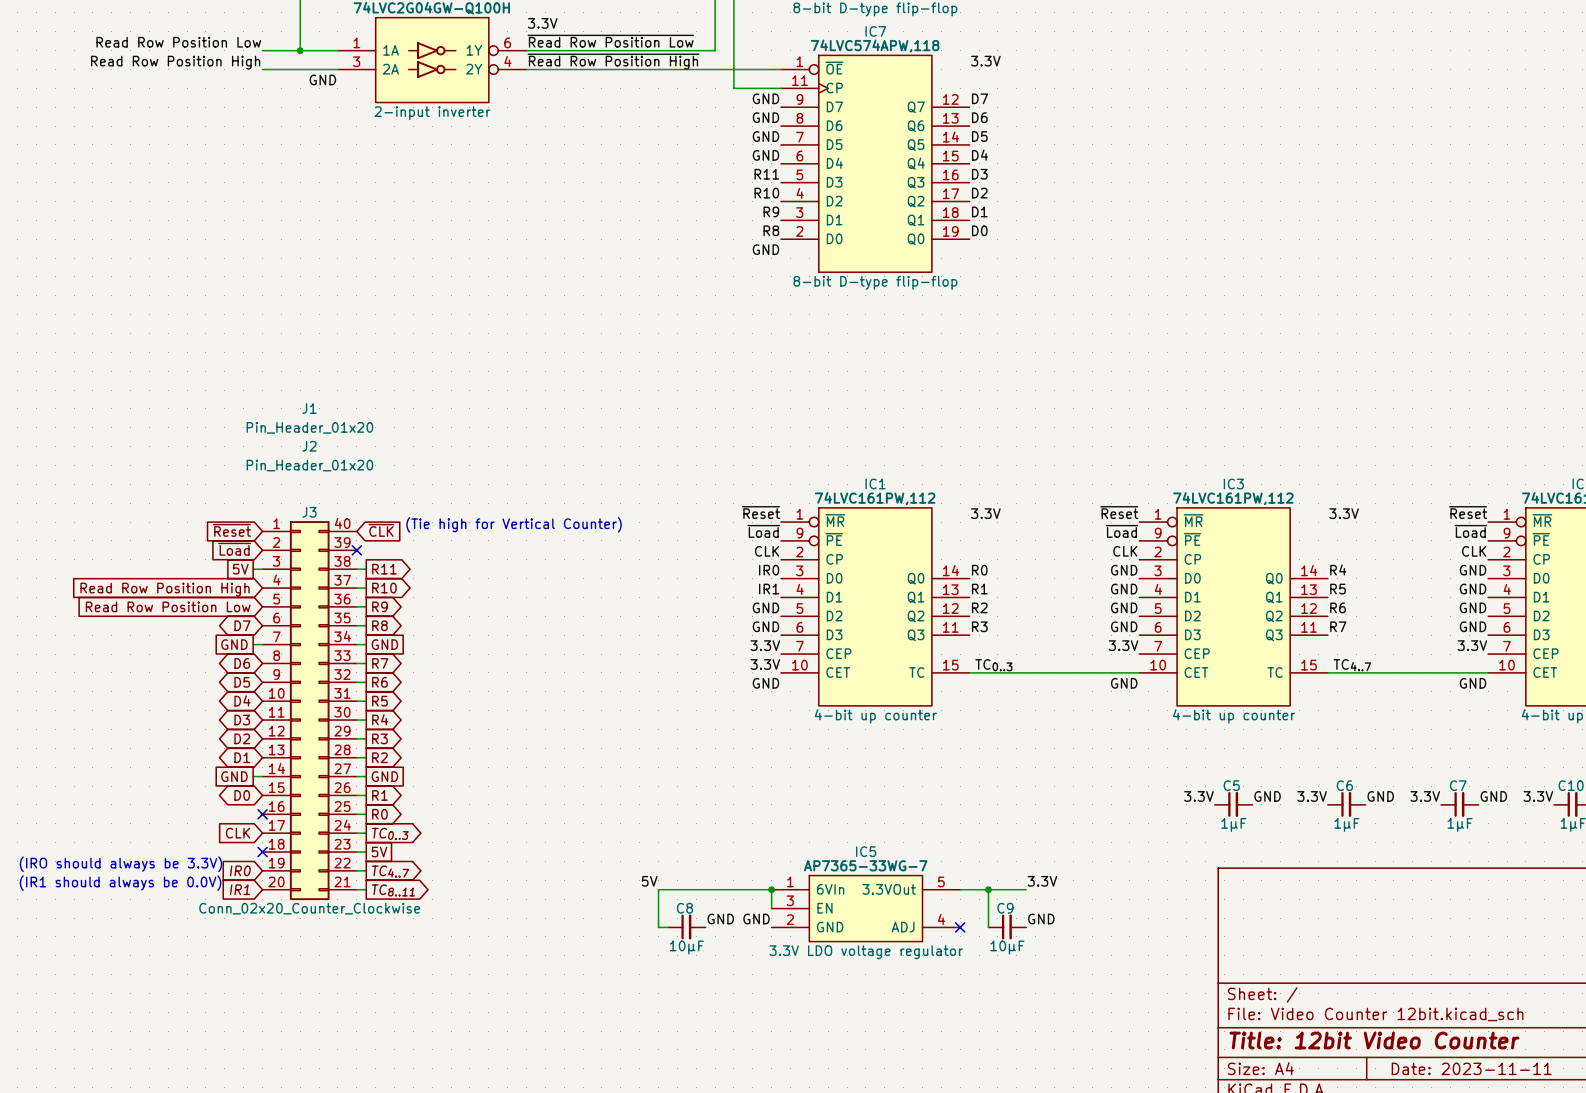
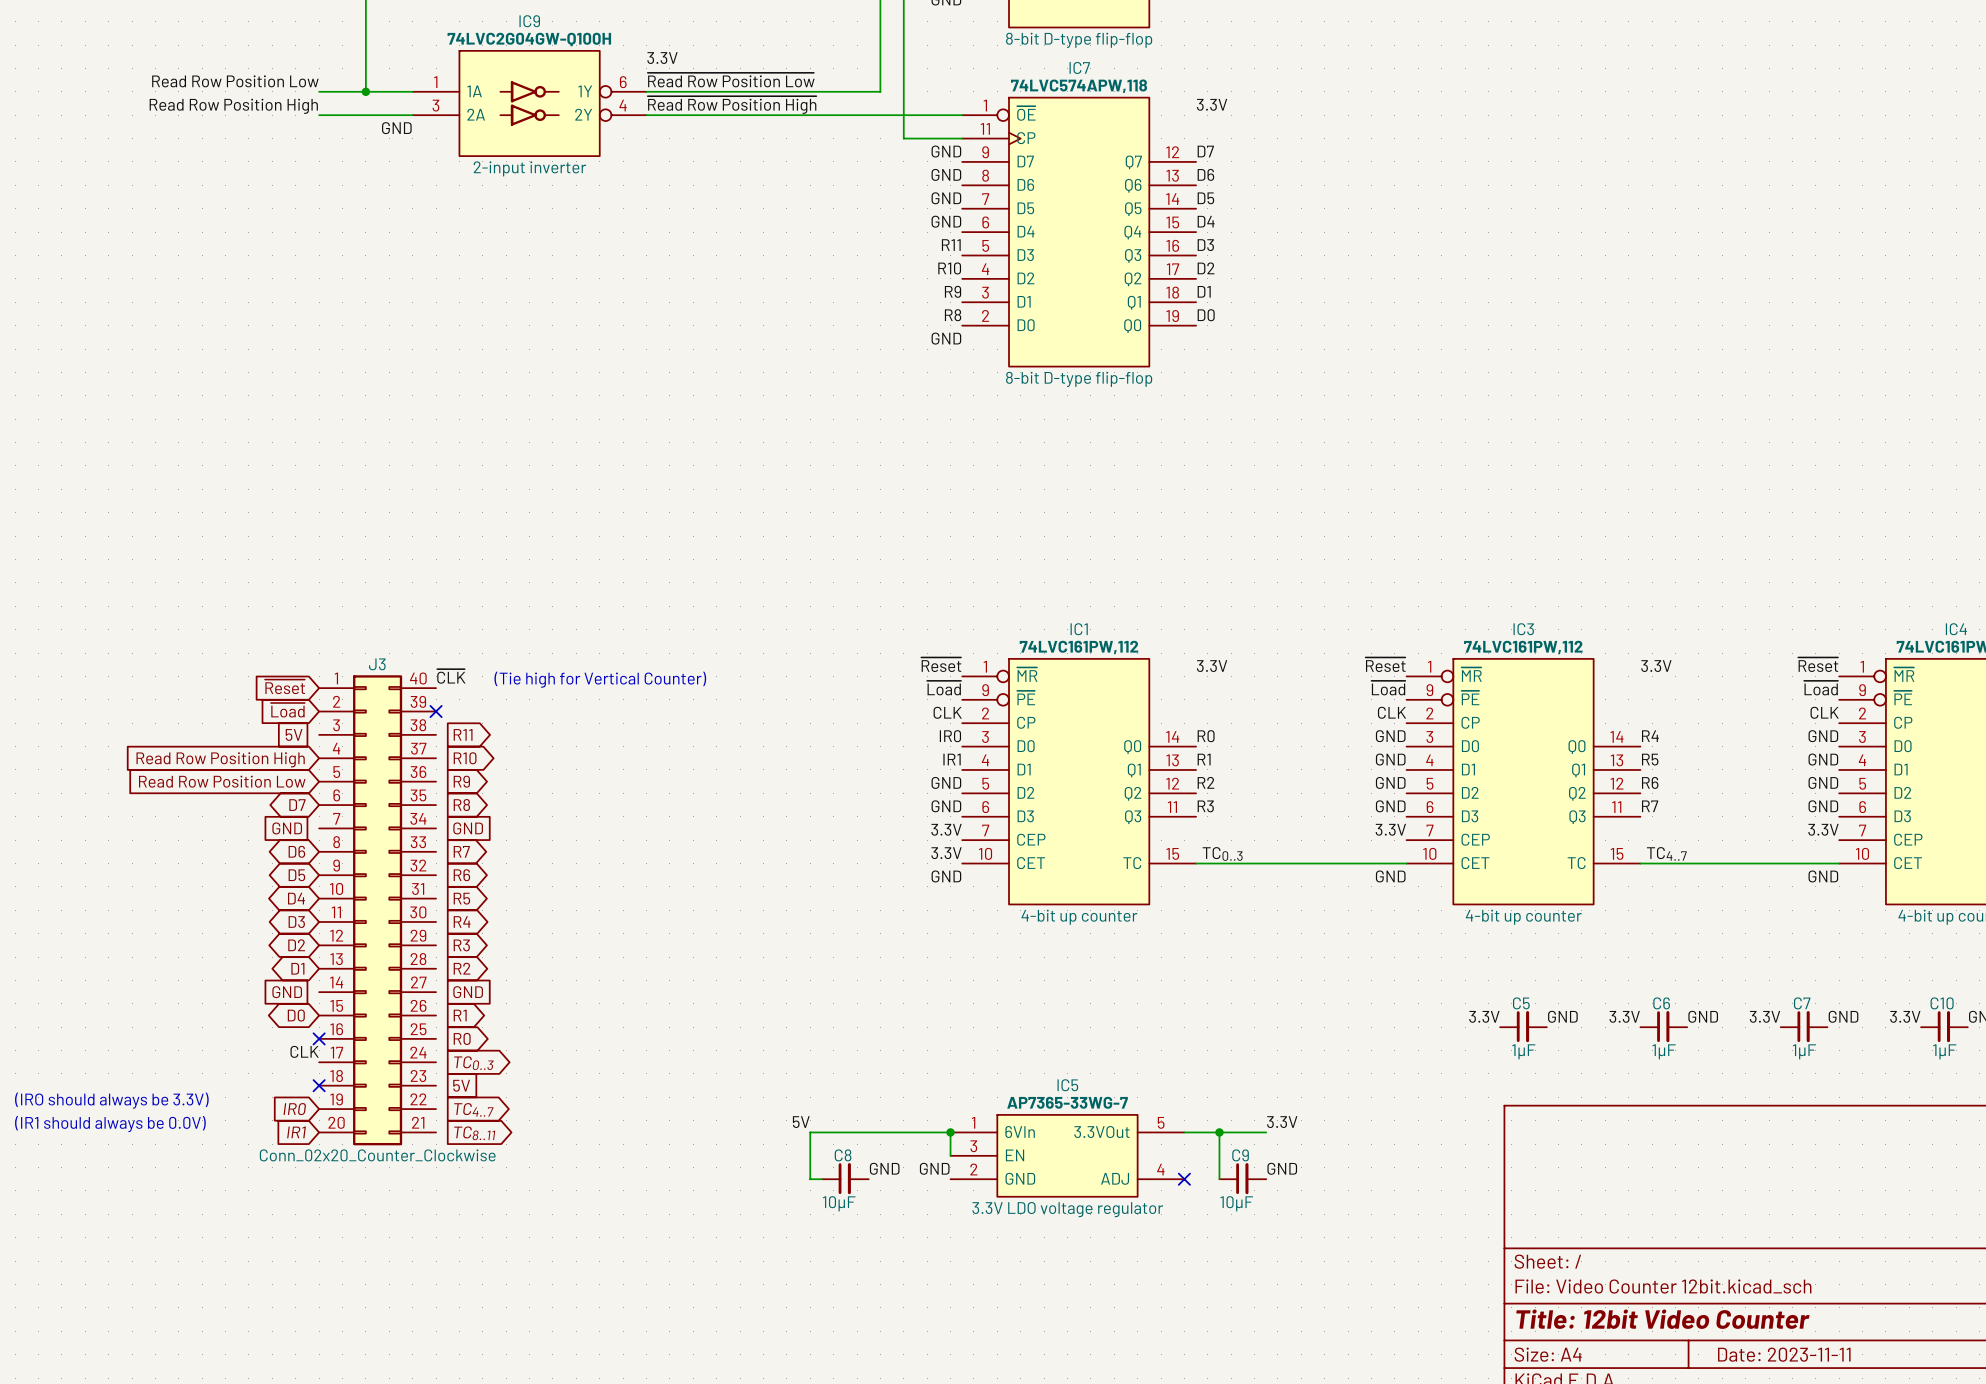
J1: Pin_Header_01x20 (309, 418) -> none
J2: Pin_Header_01x20 (309, 456) -> none
label: none -> ~{CLK} (451, 676)
global label: ~{CLK} (381, 530) -> none
wire: (253, 569) (262, 569) -> none
wire: (356, 569) (366, 569) -> none
wire: (356, 588) (366, 588) -> none
wire: (356, 606) (366, 606) -> none
wire: (356, 625) (366, 625) -> none
wire: (253, 644) (262, 644) -> none
wire: (356, 644) (366, 644) -> none
wire: (356, 663) (366, 663) -> none
wire: (356, 682) (366, 682) -> none
wire: (356, 701) (366, 701) -> none
wire: (356, 720) (366, 720) -> none
wire: (356, 738) (366, 738) -> none
wire: (356, 757) (366, 757) -> none
wire: (253, 776) (262, 776) -> none
wire: (356, 776) (366, 776) -> none
wire: (356, 795) (366, 795) -> none
wire: (356, 814) (366, 814) -> none
label: none -> CLK (304, 1051)
global label: CLK (237, 833) -> none
wire: (356, 833) (366, 833) -> none
wire: (356, 852) (366, 852) -> none
wire: (356, 870) (366, 870) -> none
wire: (356, 889) (366, 889) -> none

